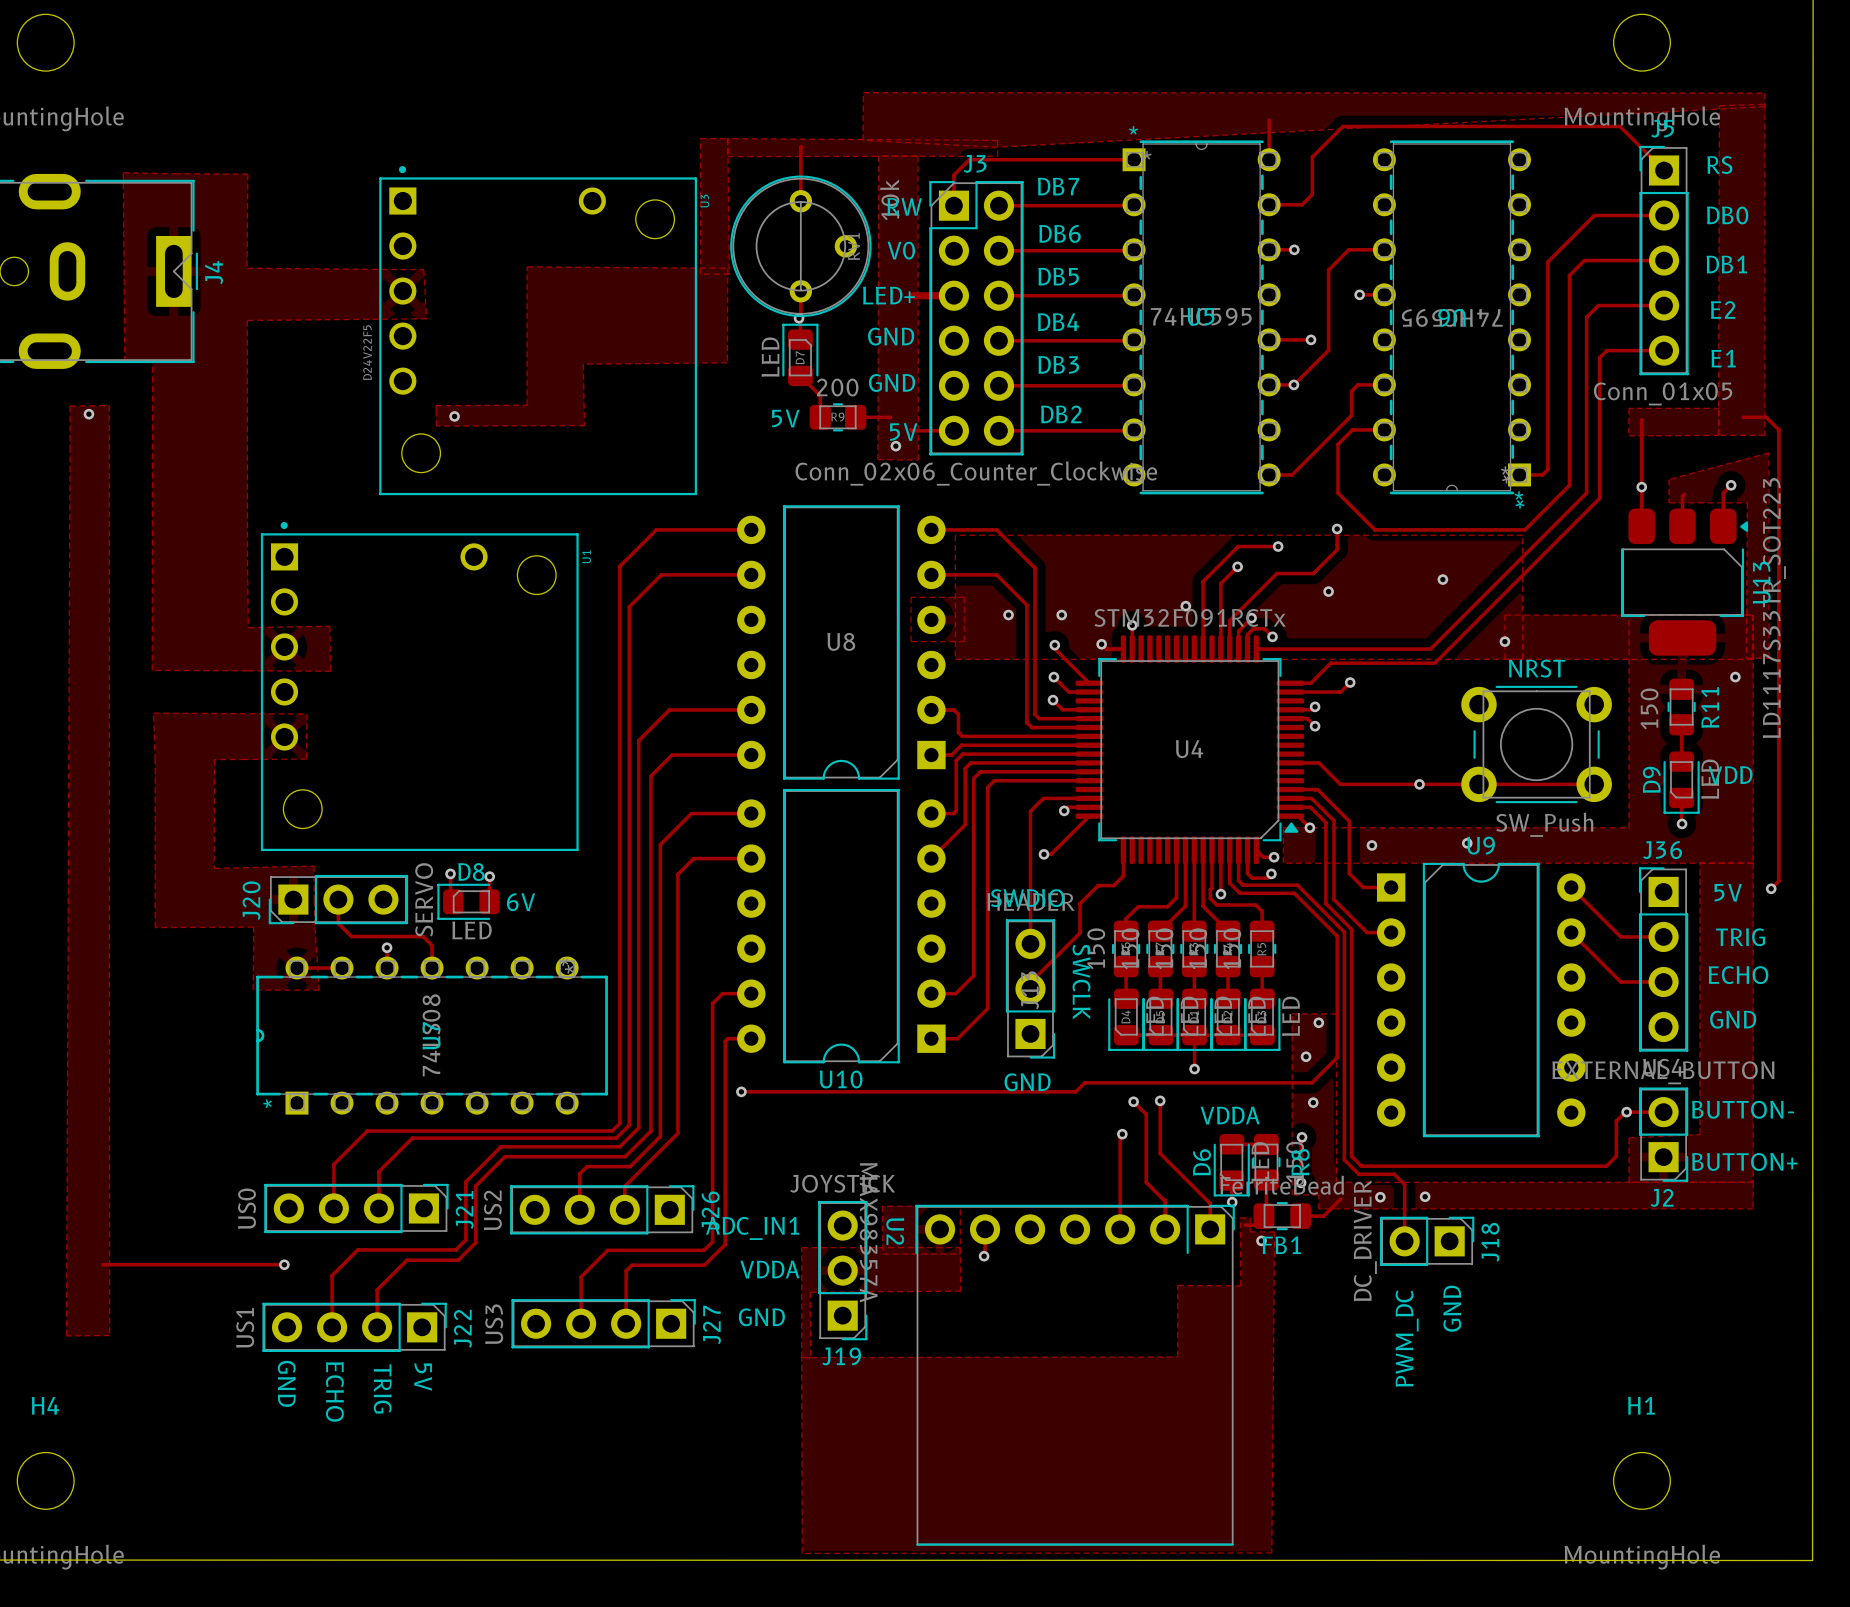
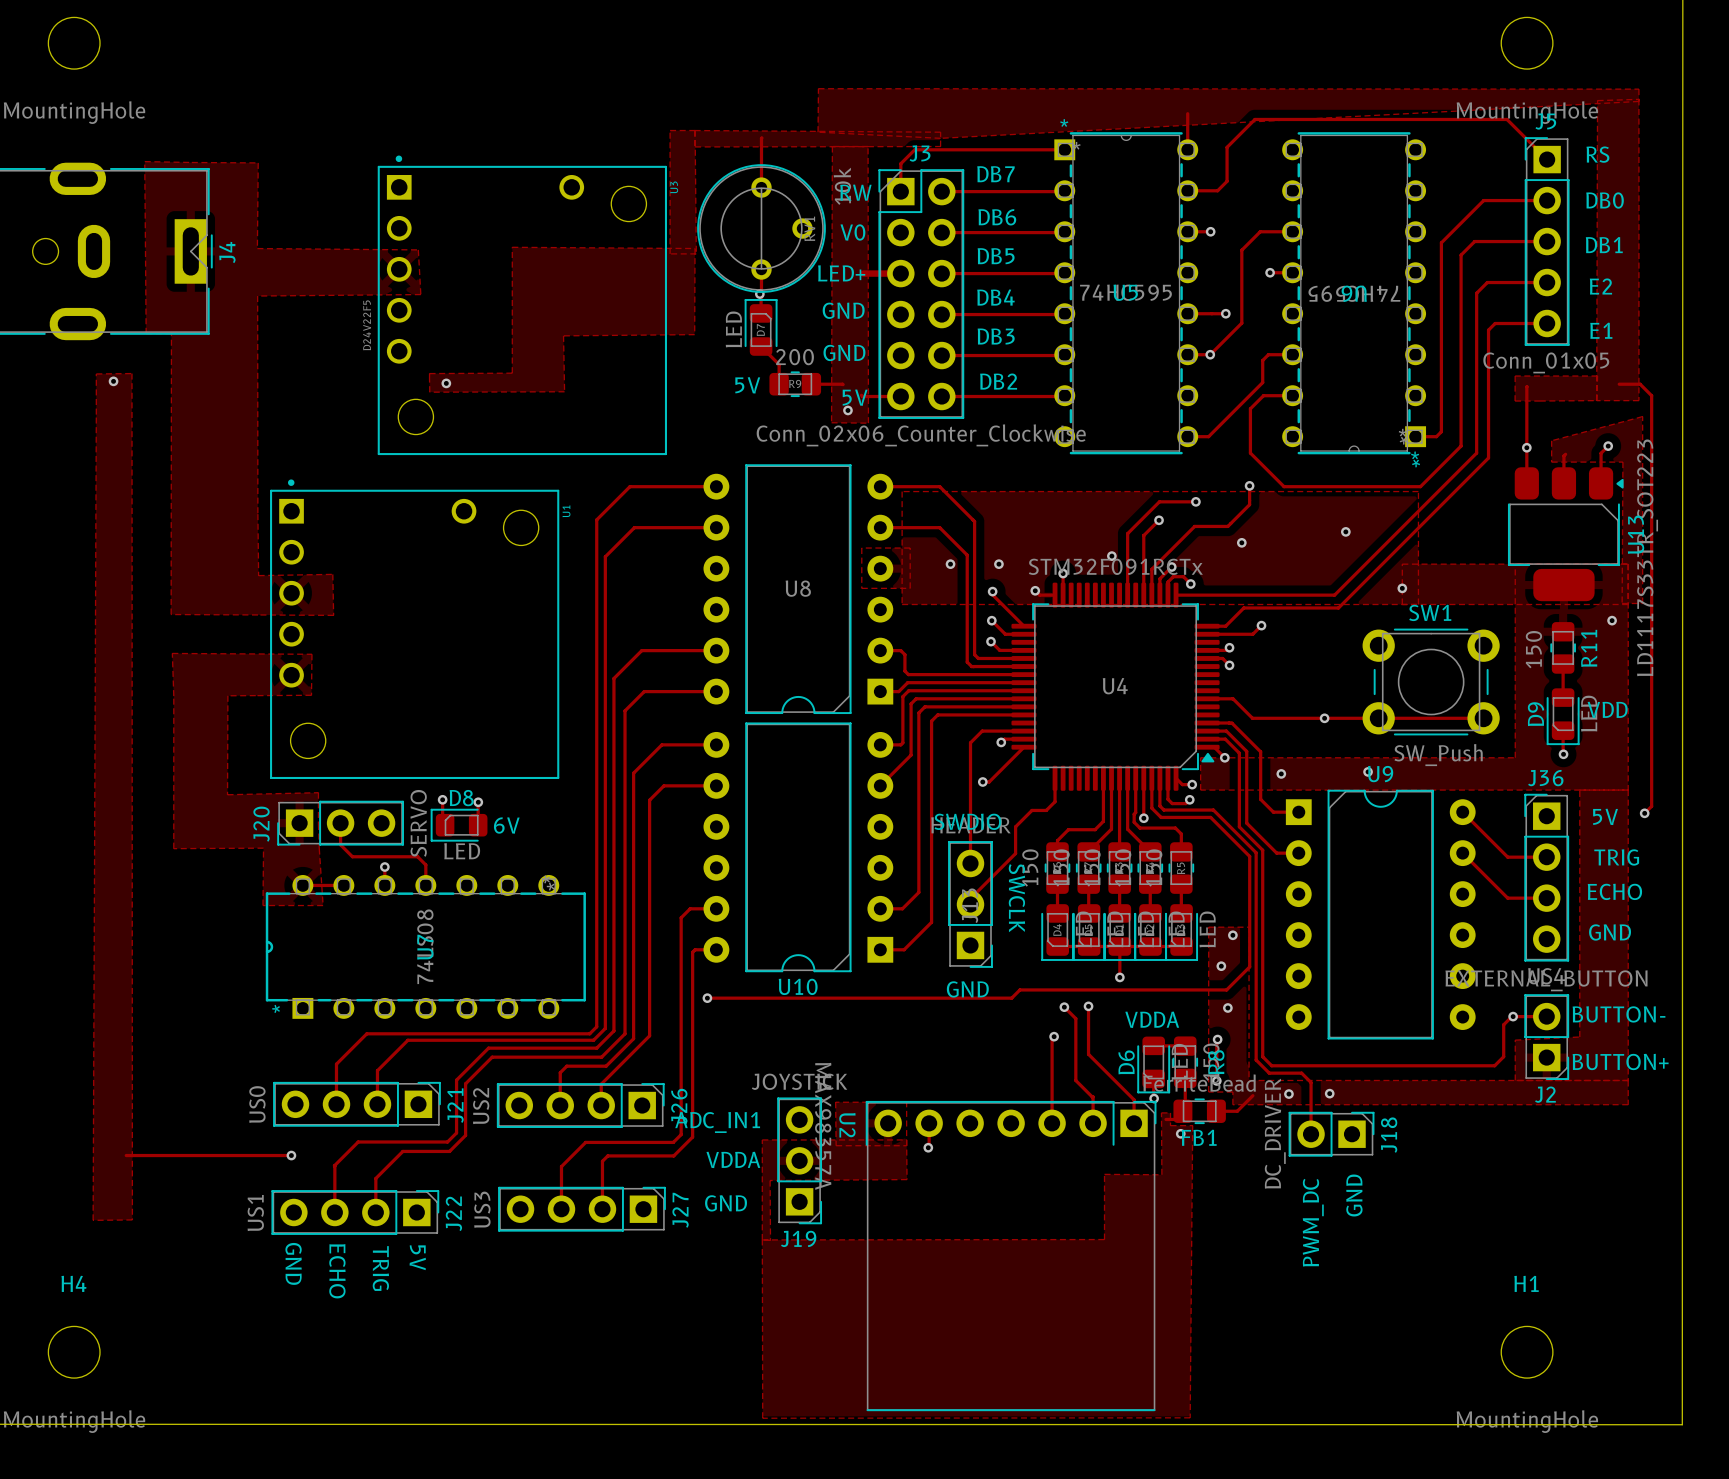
NRST name: NRST (1537, 668) -> SW1 (1430, 612)

